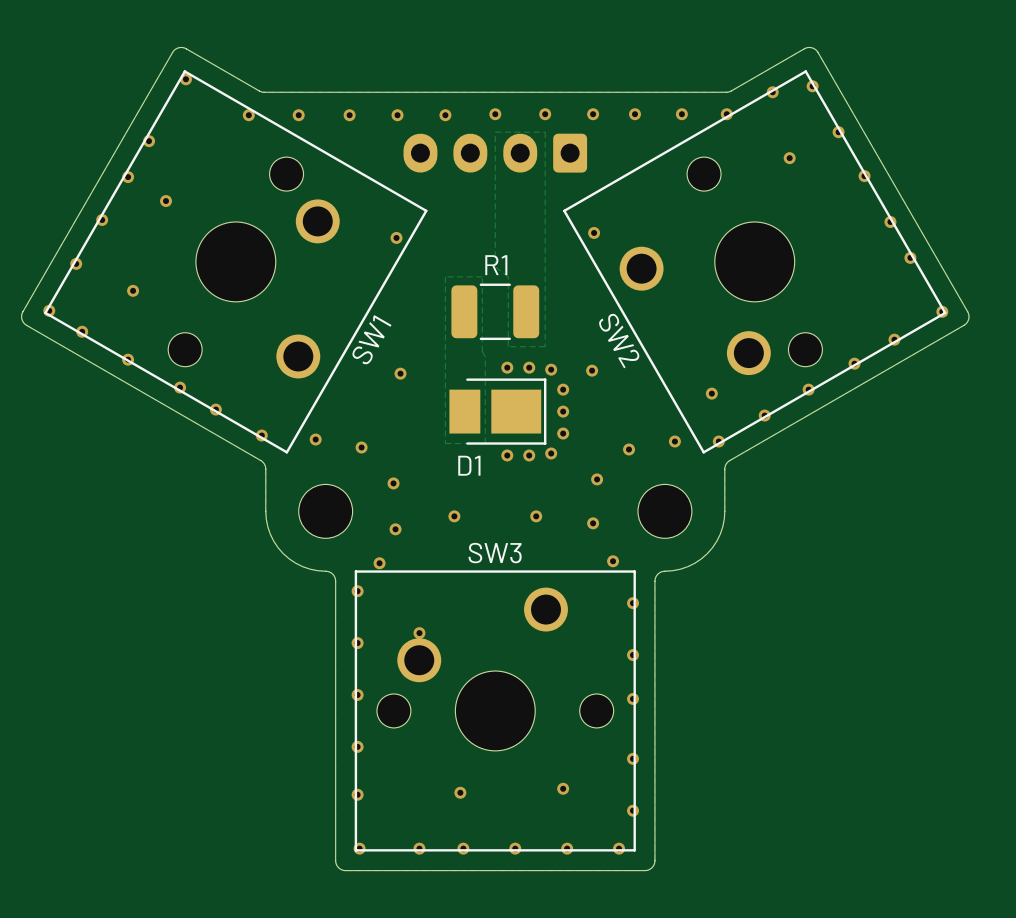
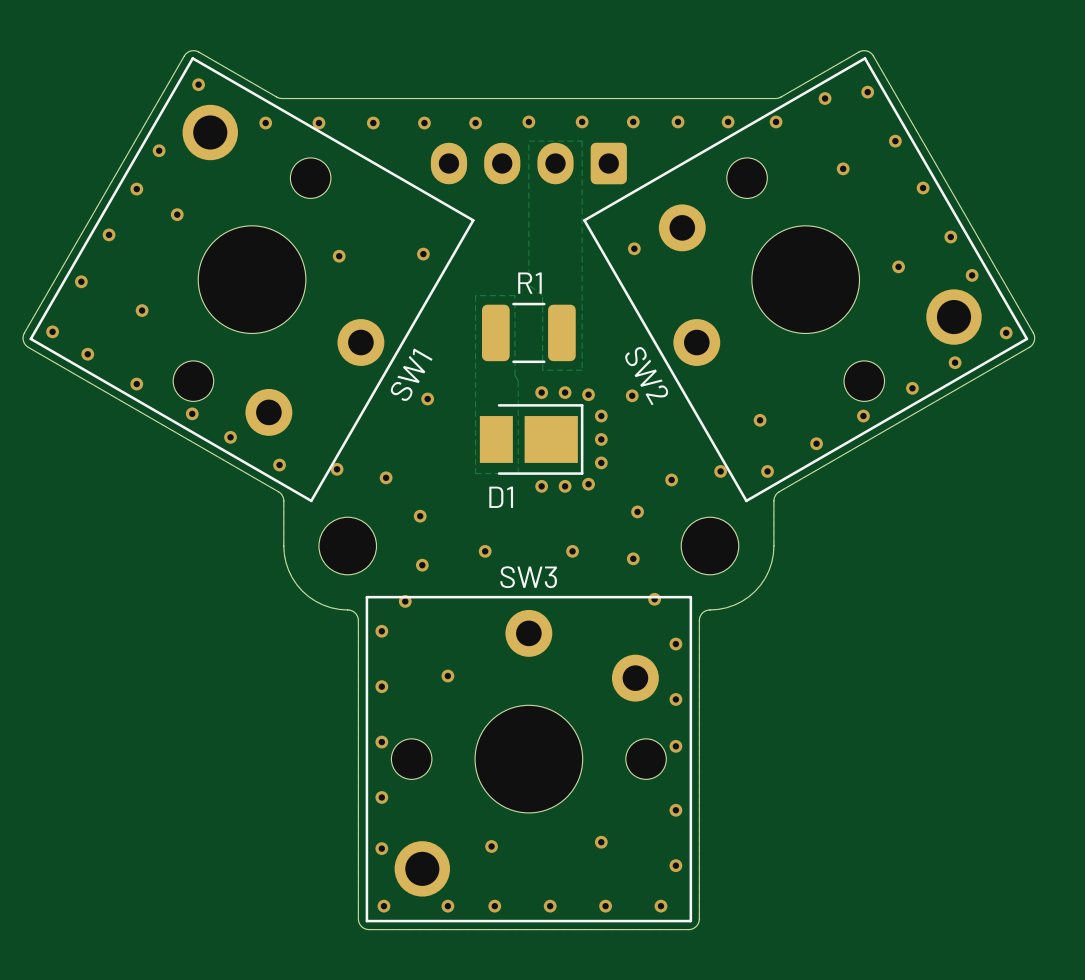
SW1 footprint: [44, 70, 428, 454] -> [29, 57, 475, 503]
SW2 footprint: [563, 70, 947, 454] -> [583, 57, 1029, 503]
via: none -> (339, 256)
via: none -> (898, 266)
SW3 footprint: [354, 570, 636, 852] -> [365, 595, 693, 923]

